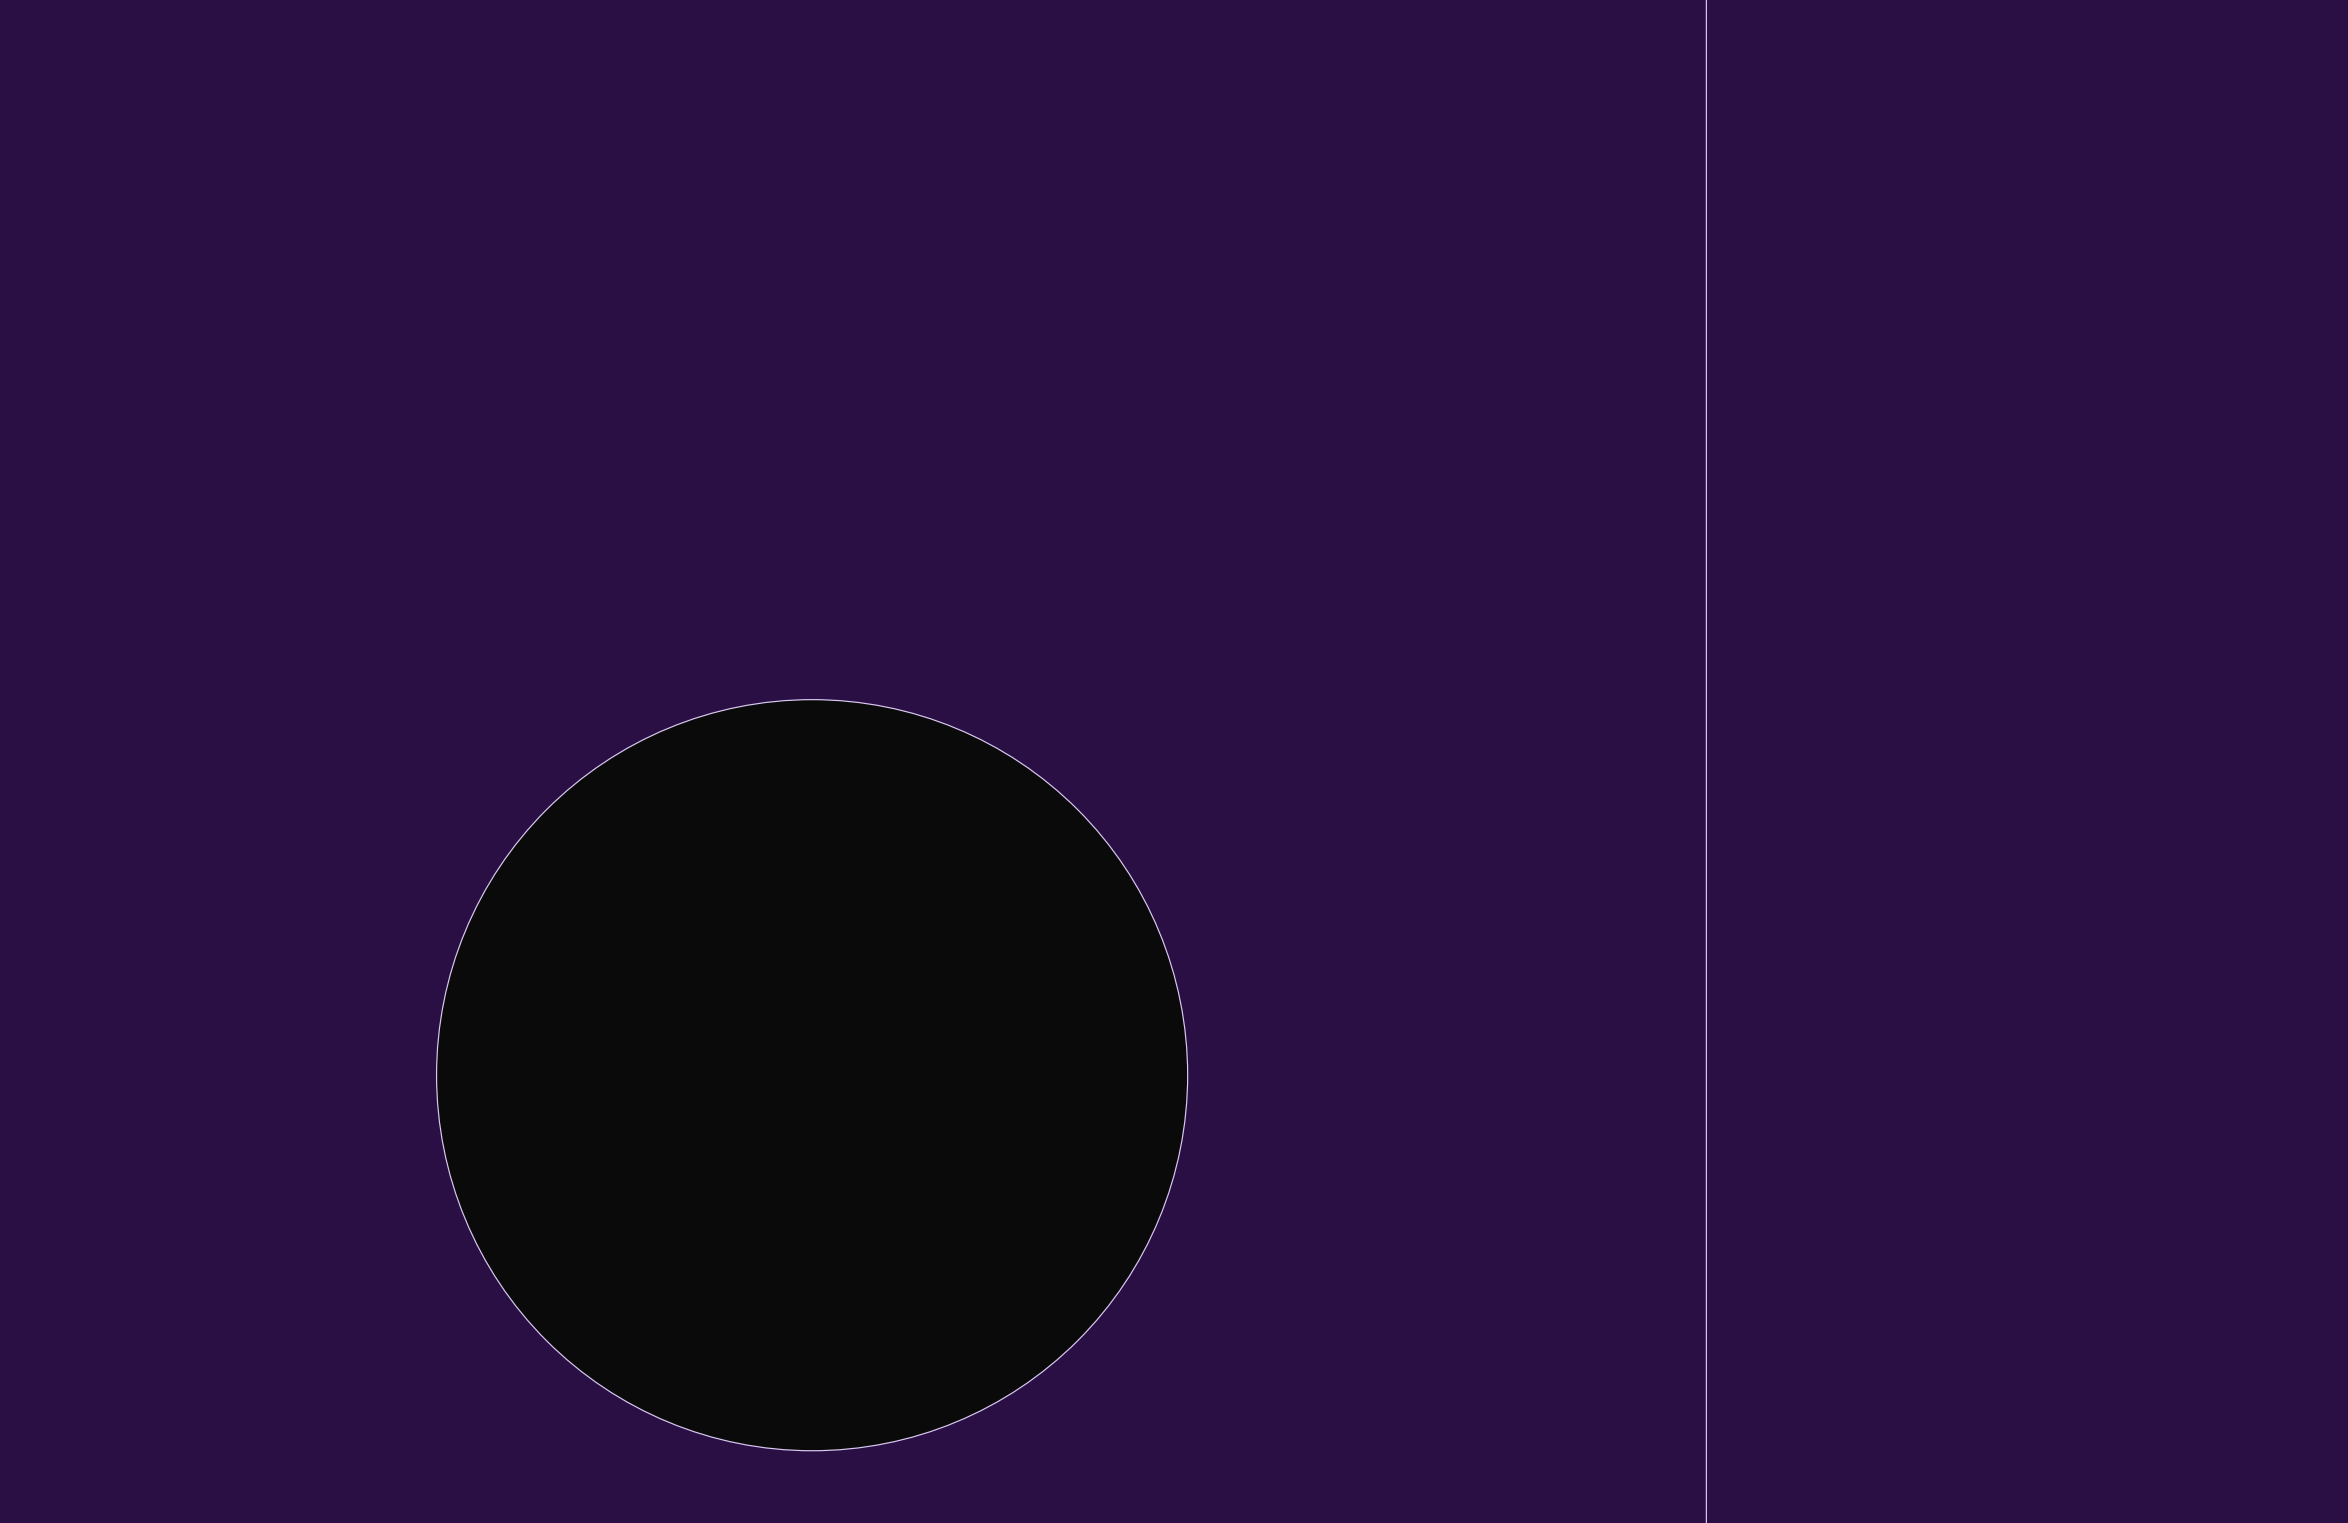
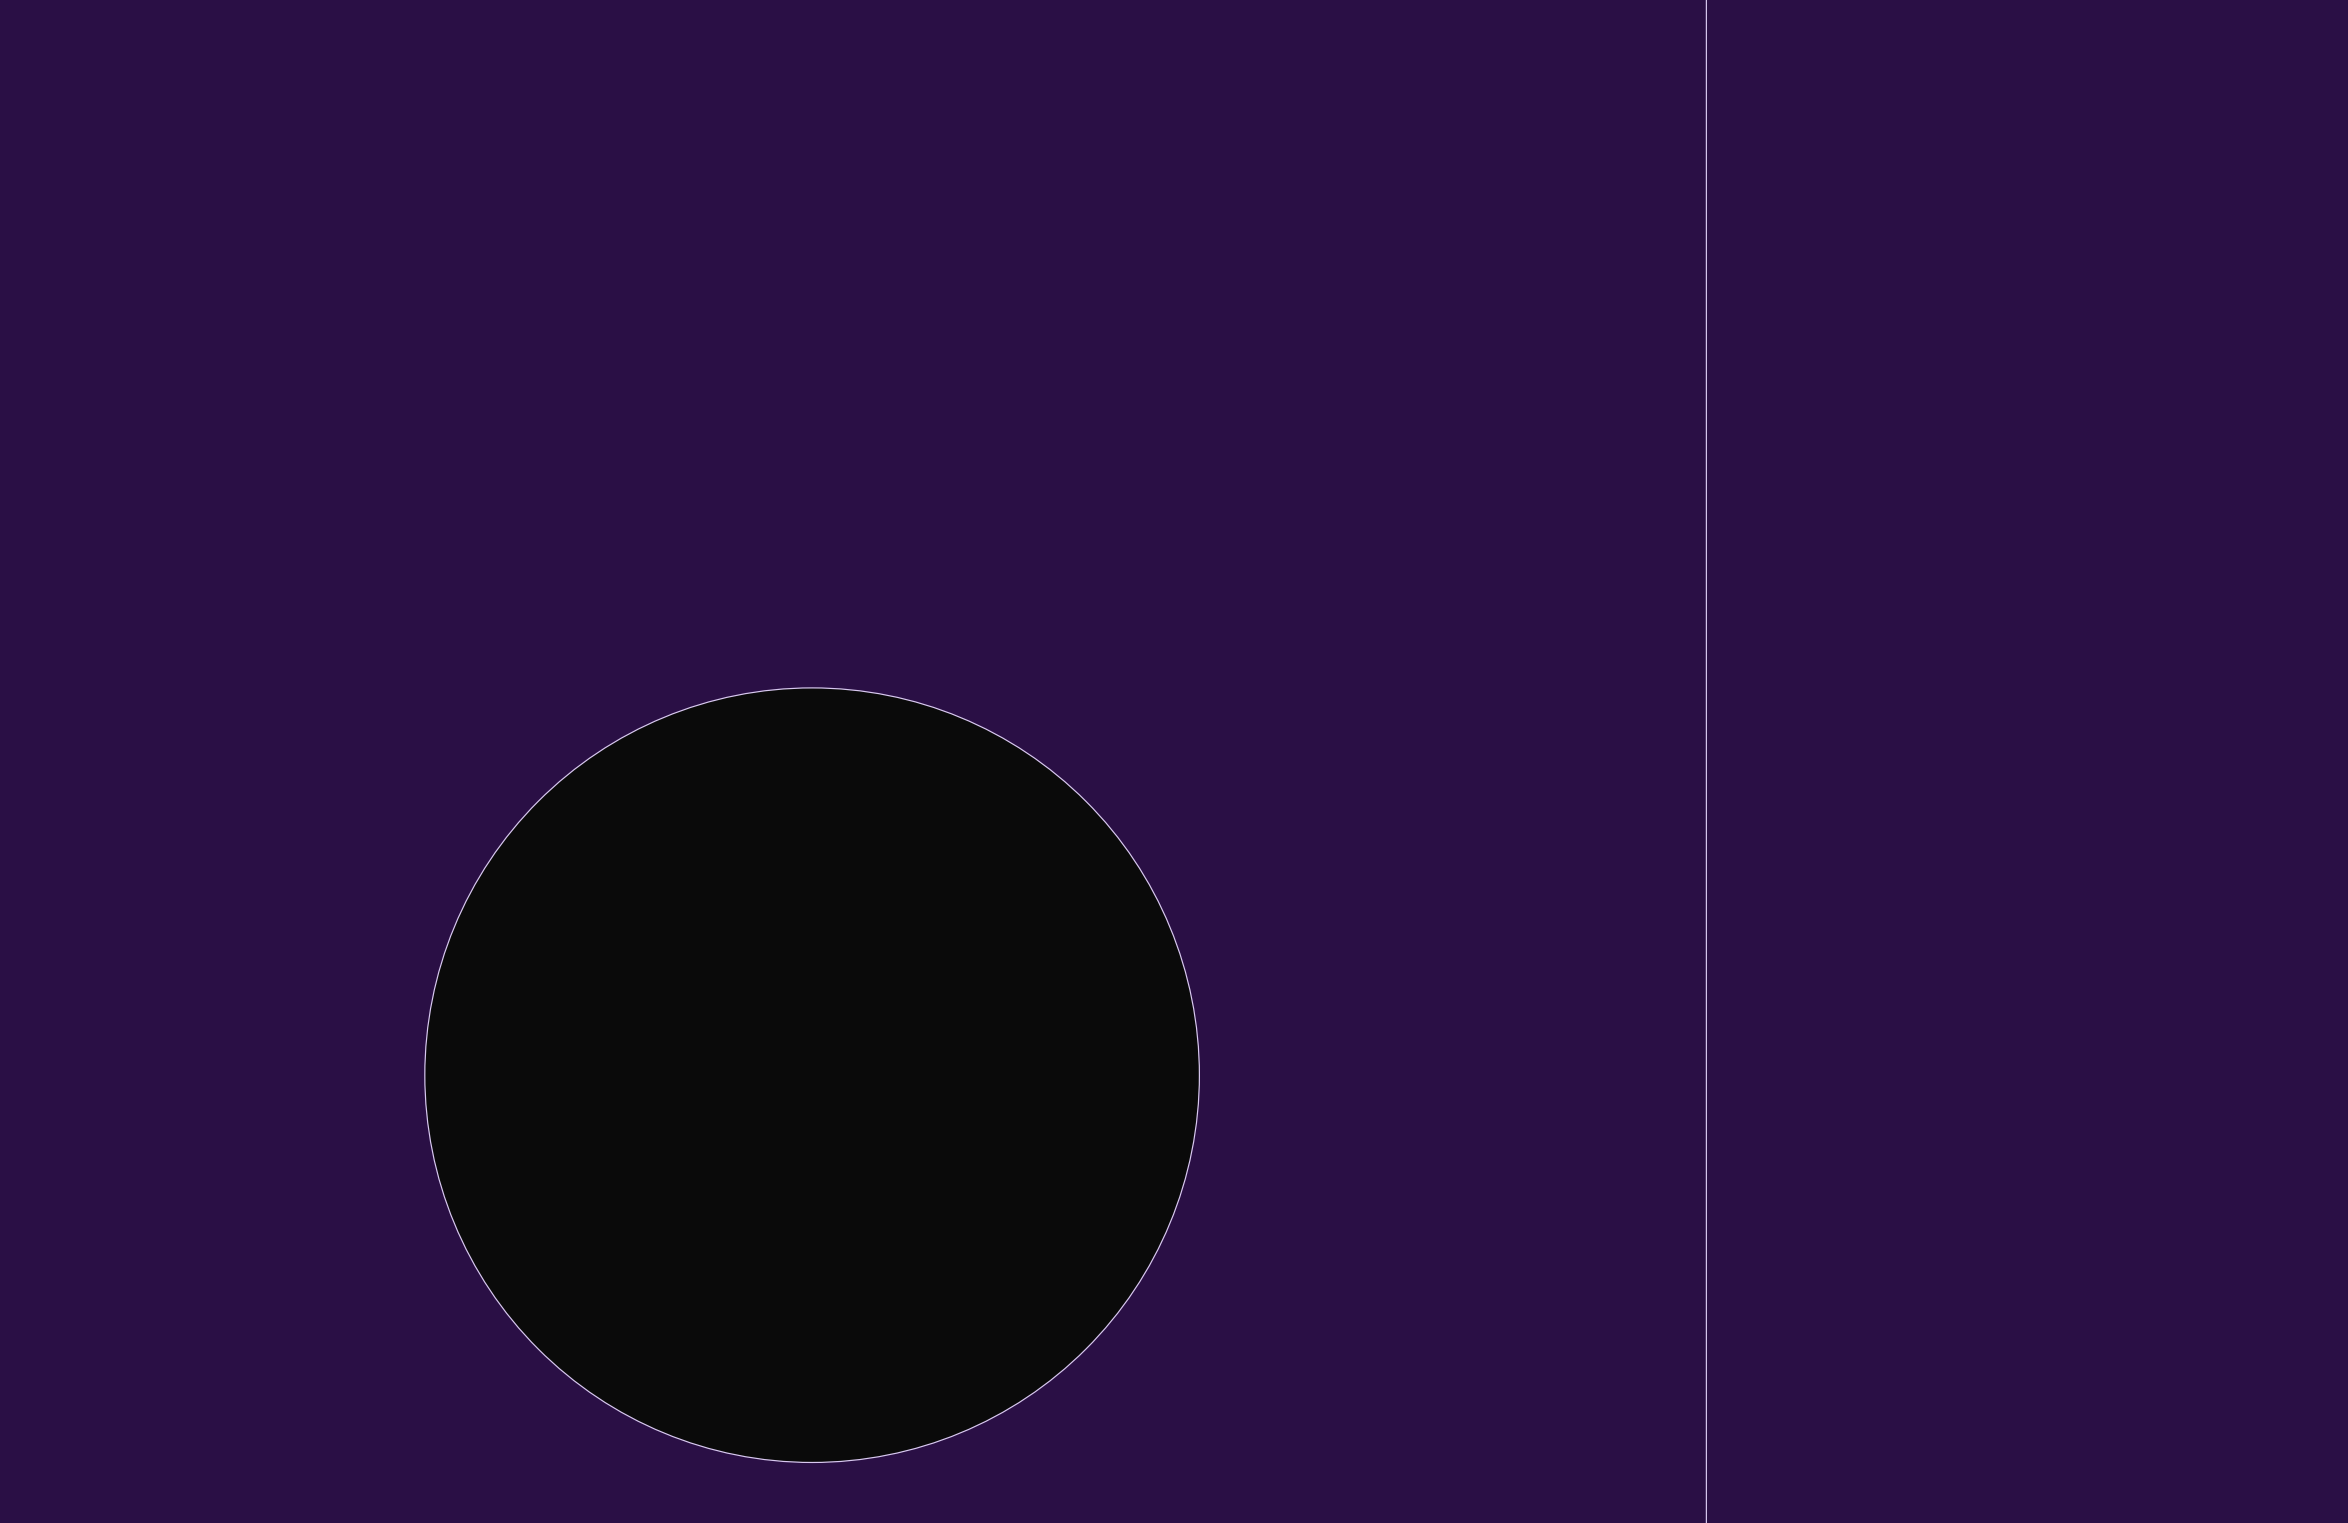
hole size: [436, 699, 1188, 1451] -> [424, 687, 1200, 1463]

